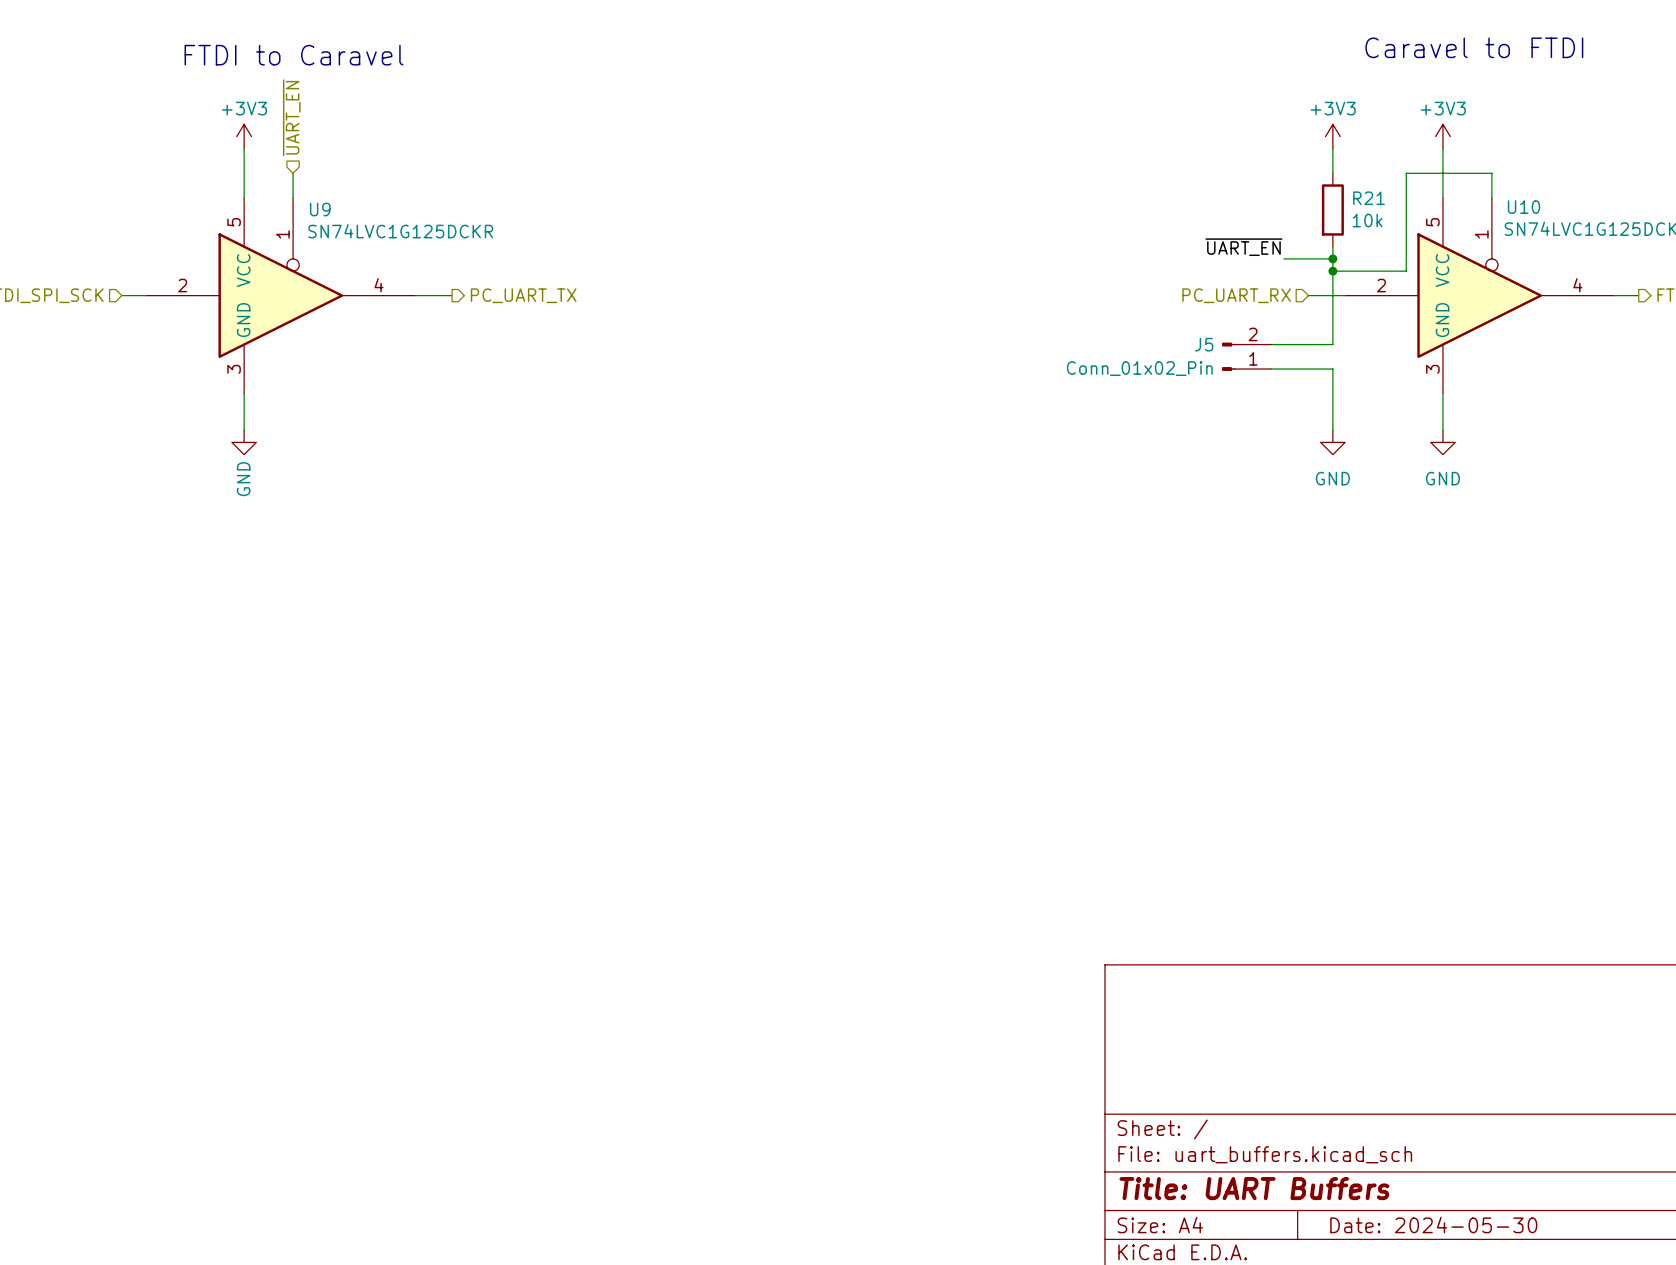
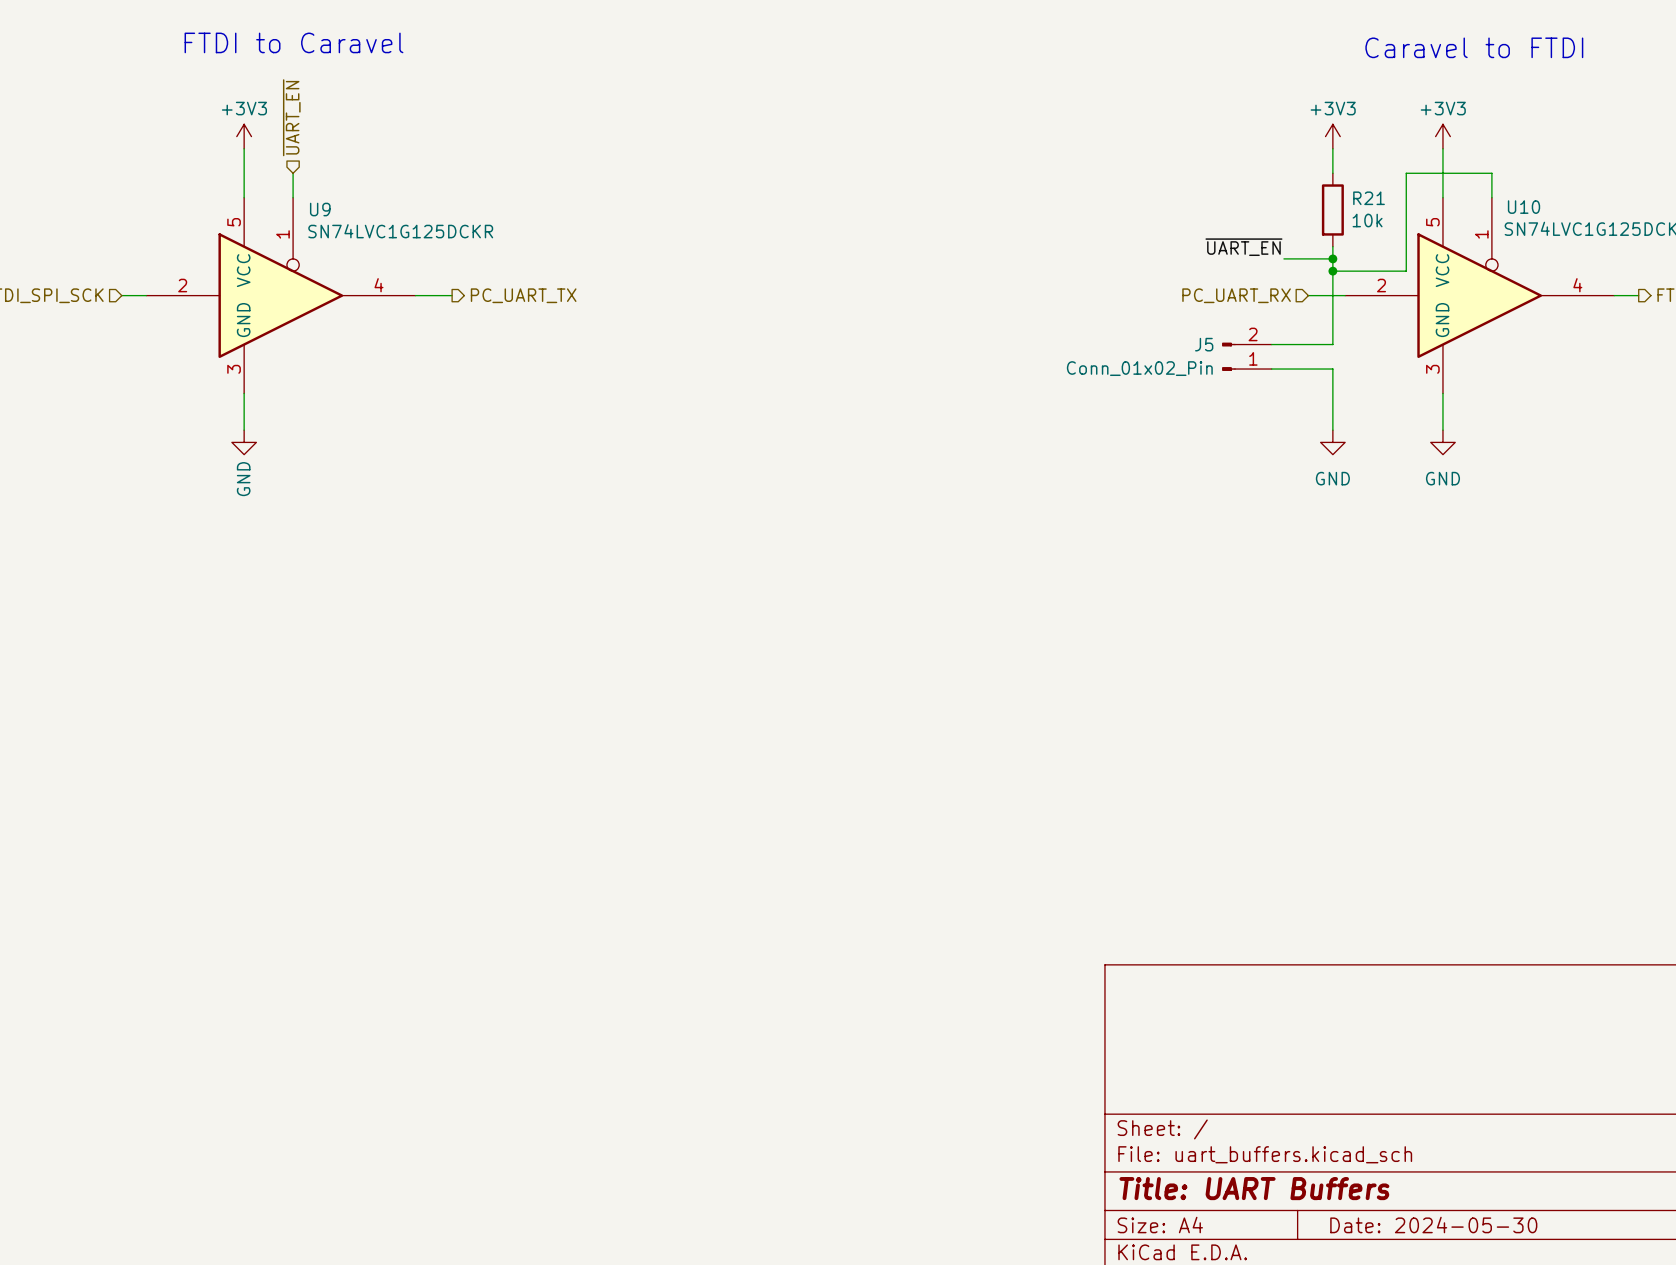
text position: FTDI to Caravel (293, 55) -> FTDI to Caravel (293, 42)

